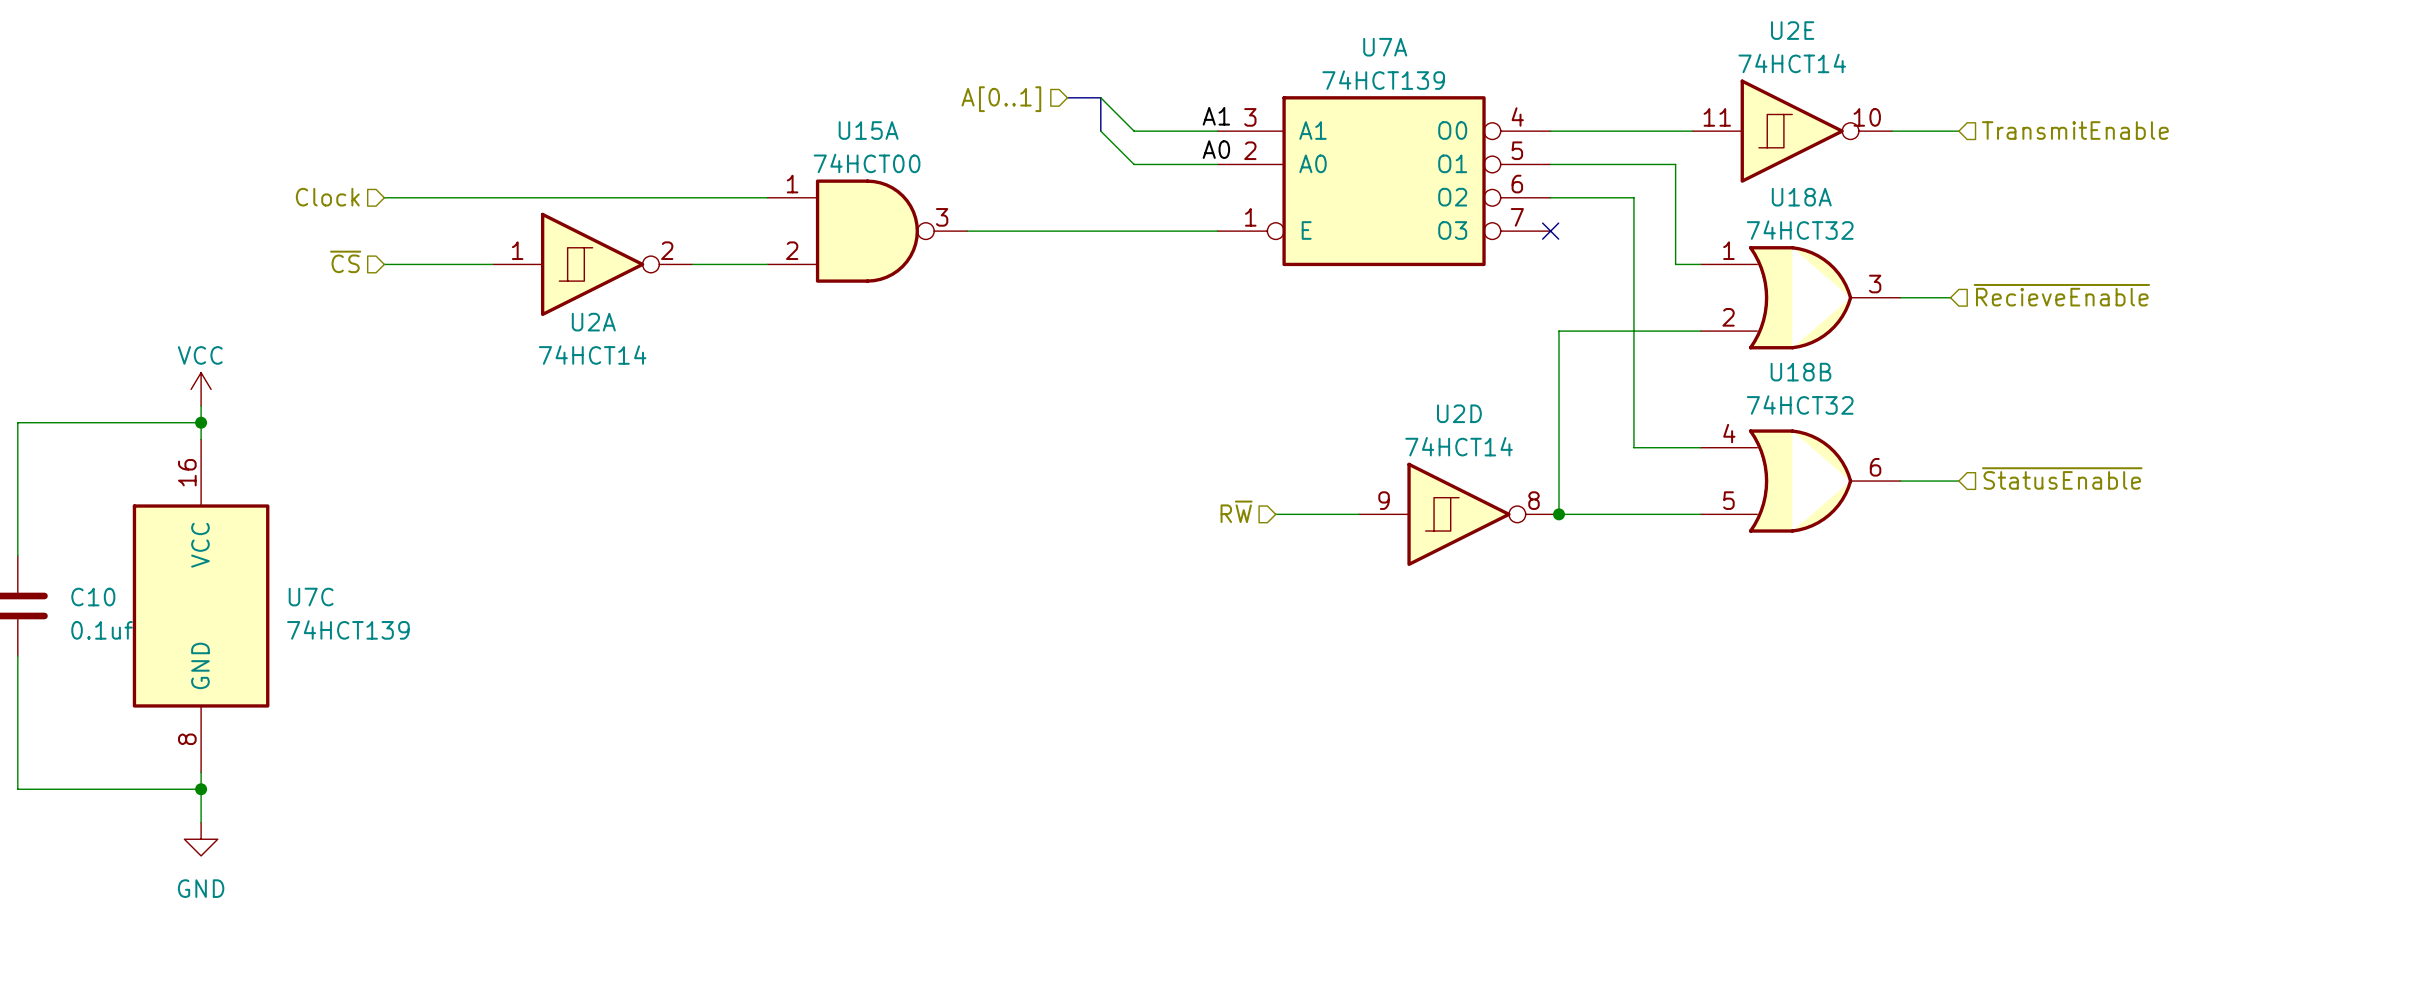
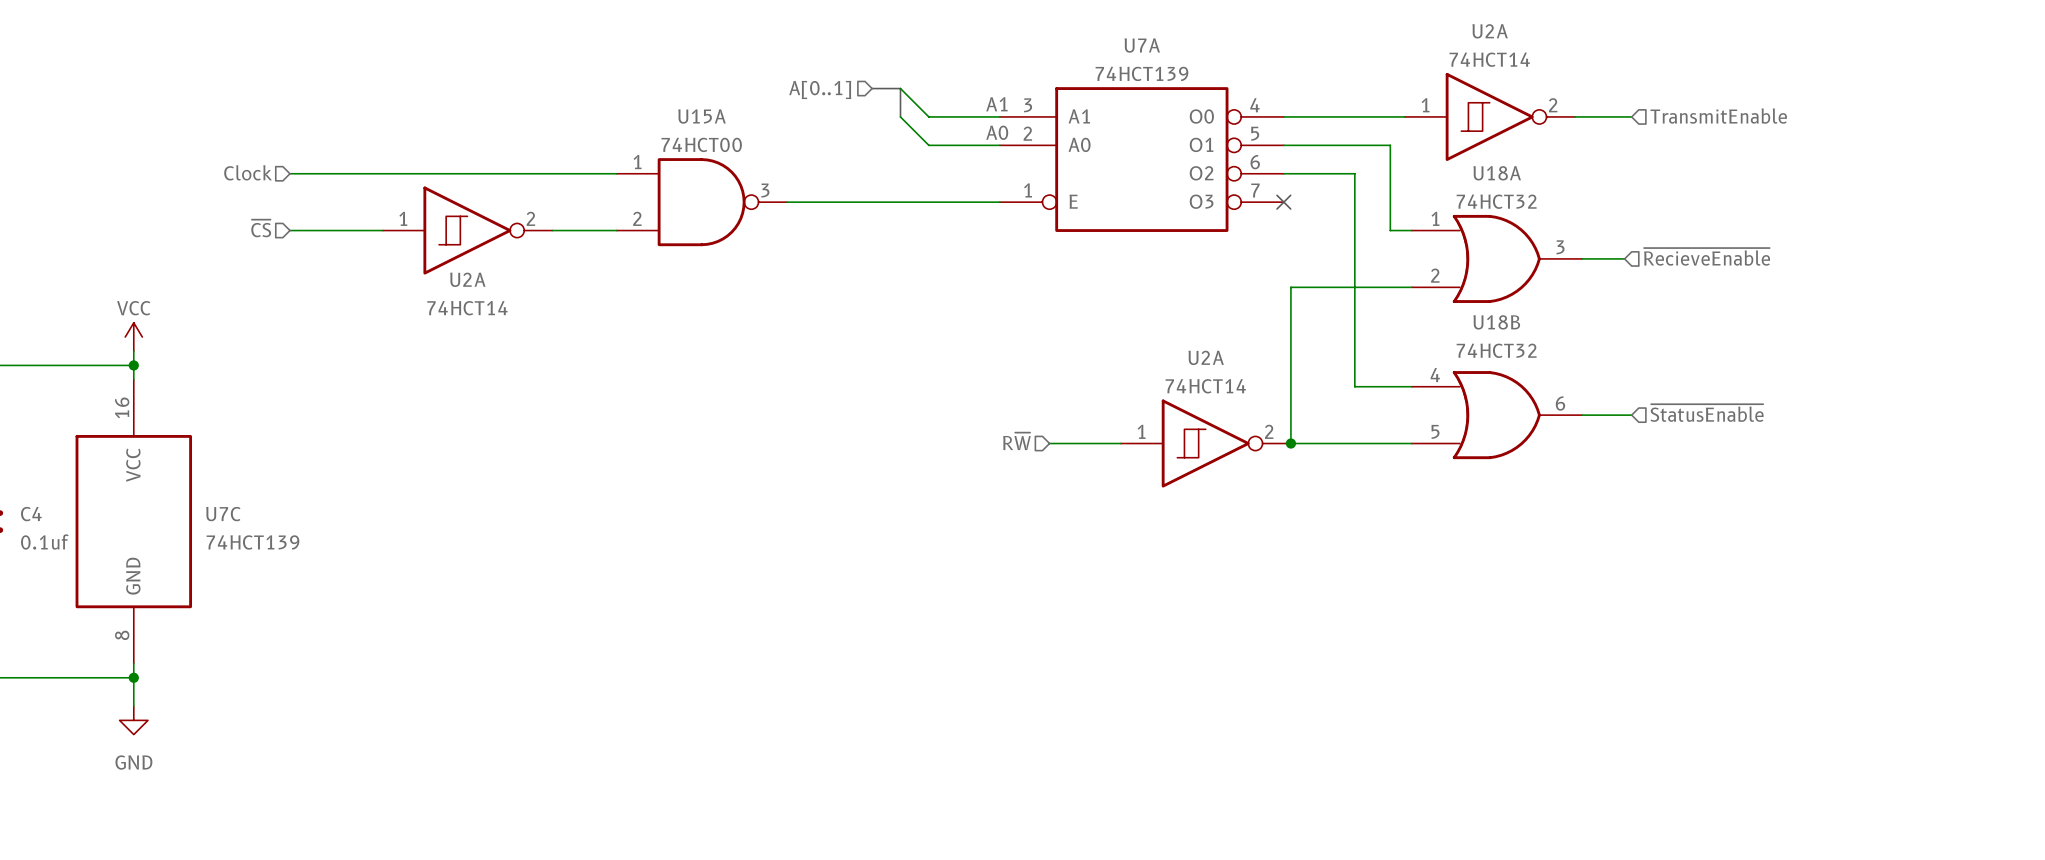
U2E name: U2E (1792, 30) -> U2A (1490, 31)
U2E pin number: 11 (1717, 117) -> 1 (1425, 105)
U2E pin number: 10 (1867, 117) -> 2 (1553, 105)
U2D name: U2D (1459, 413) -> U2A (1206, 357)
U2D pin number: 9 (1384, 500) -> 1 (1141, 431)
U2D pin number: 8 (1534, 500) -> 2 (1269, 431)
C10 name: C10 (93, 597) -> C4 (31, 514)

